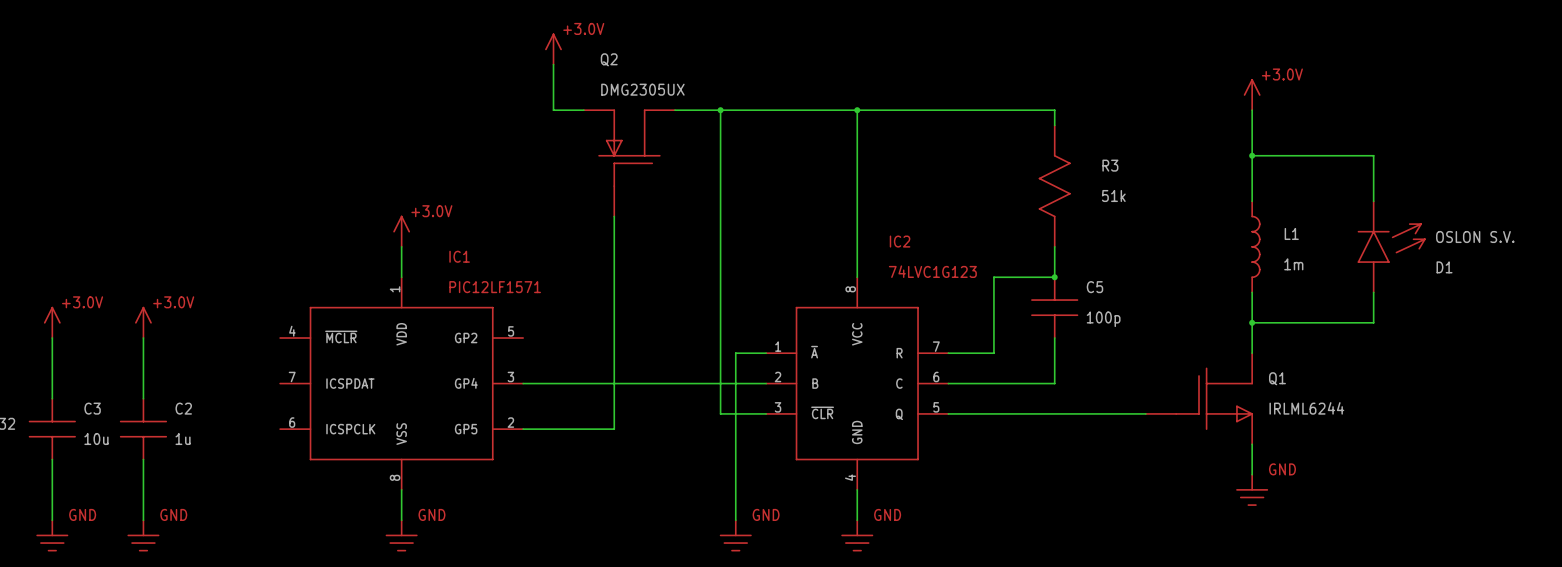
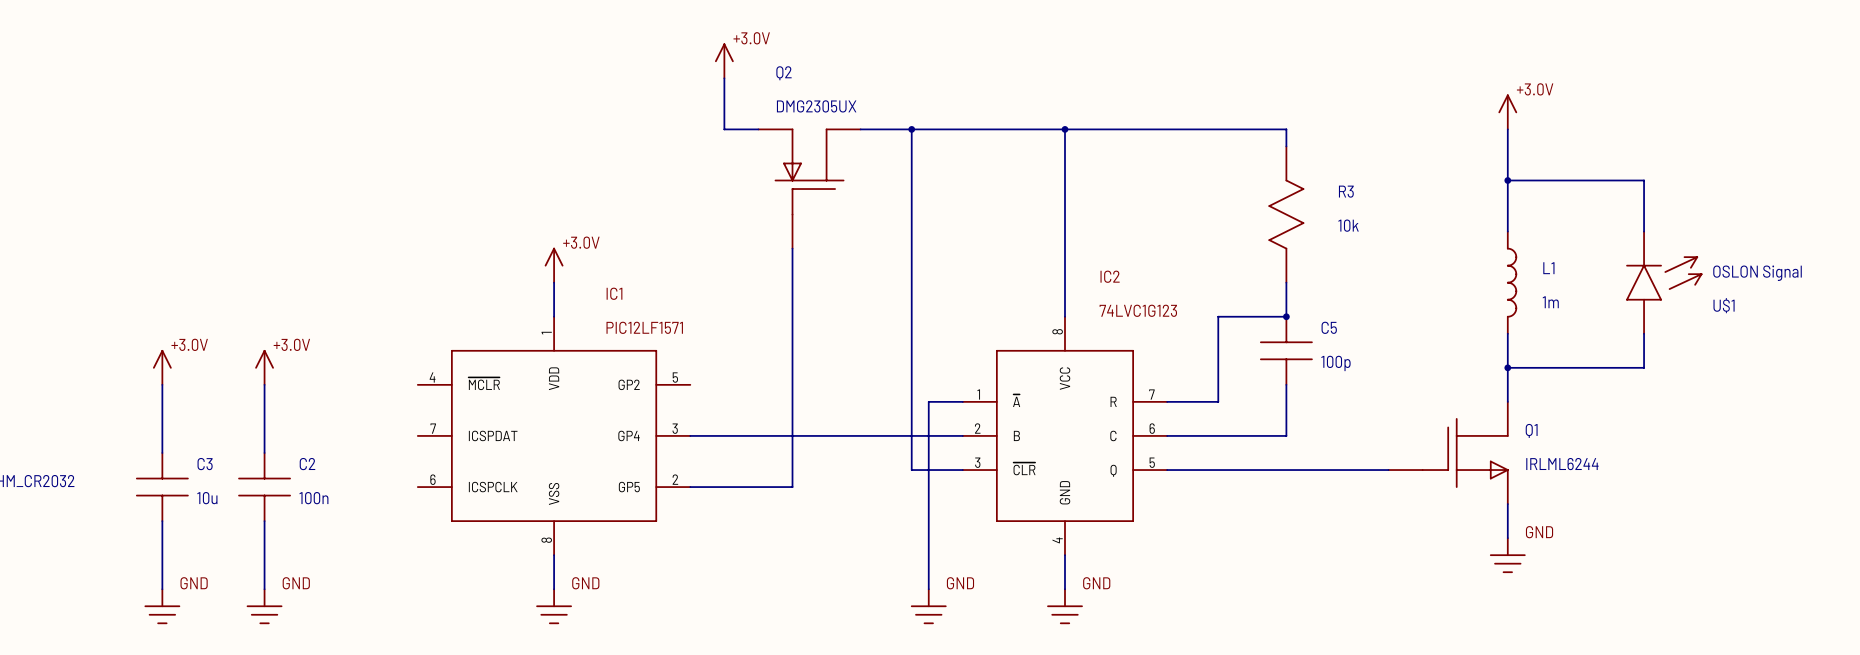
R3 value: 51k (1113, 196) -> 10k (1348, 225)
D1 value: OSLON S.V. (1475, 237) -> OSLON Signal (1757, 273)
D1 name: D1 (1444, 267) -> U$1 (1724, 305)
C2 value: 1u (183, 439) -> 100n (313, 498)

